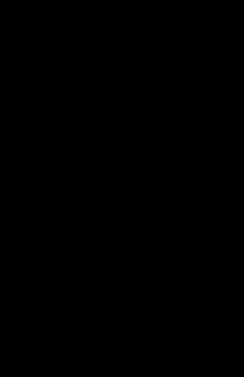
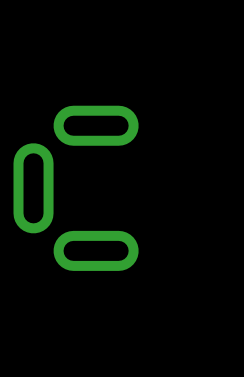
part: none -> (76, 188)

